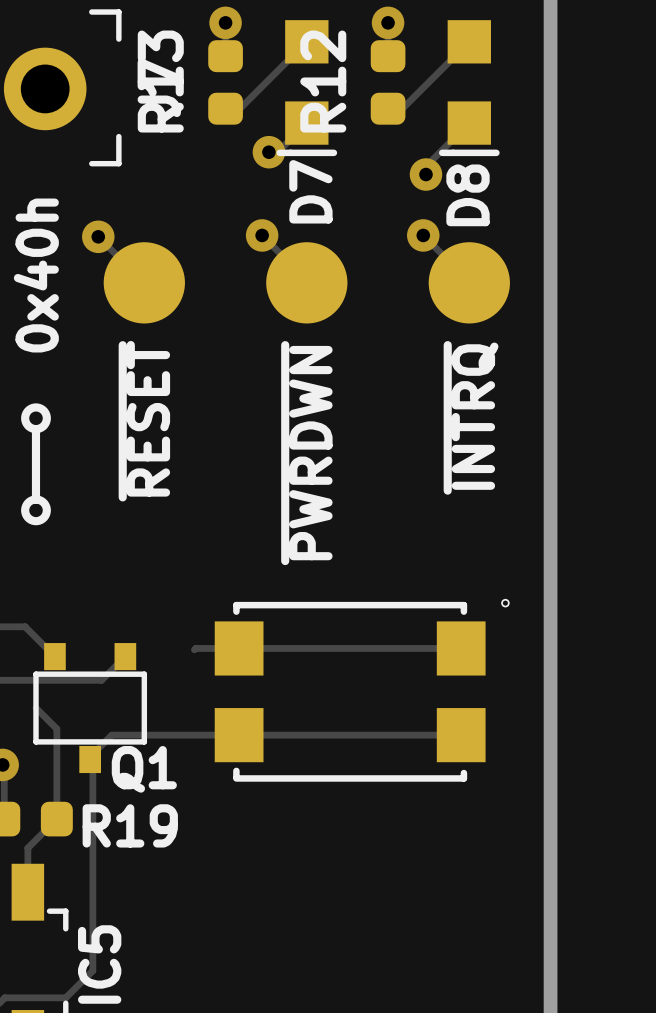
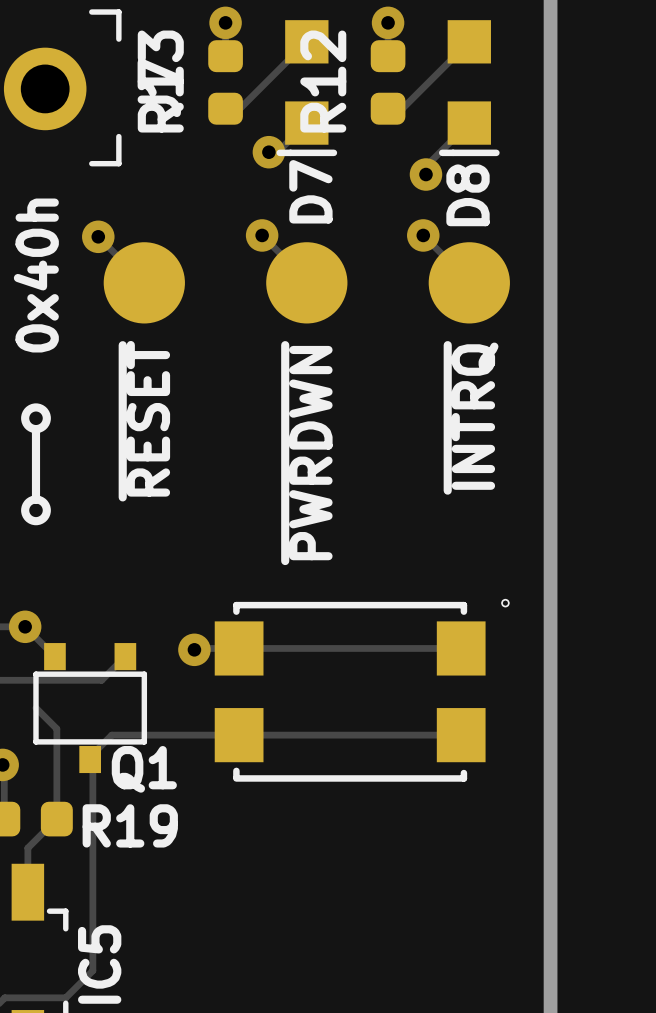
via: none -> (25, 626)
via: none -> (194, 649)

